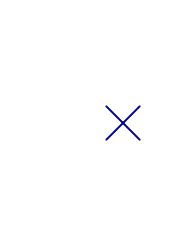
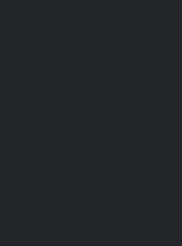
no-connect mark: (123, 123) -> none

